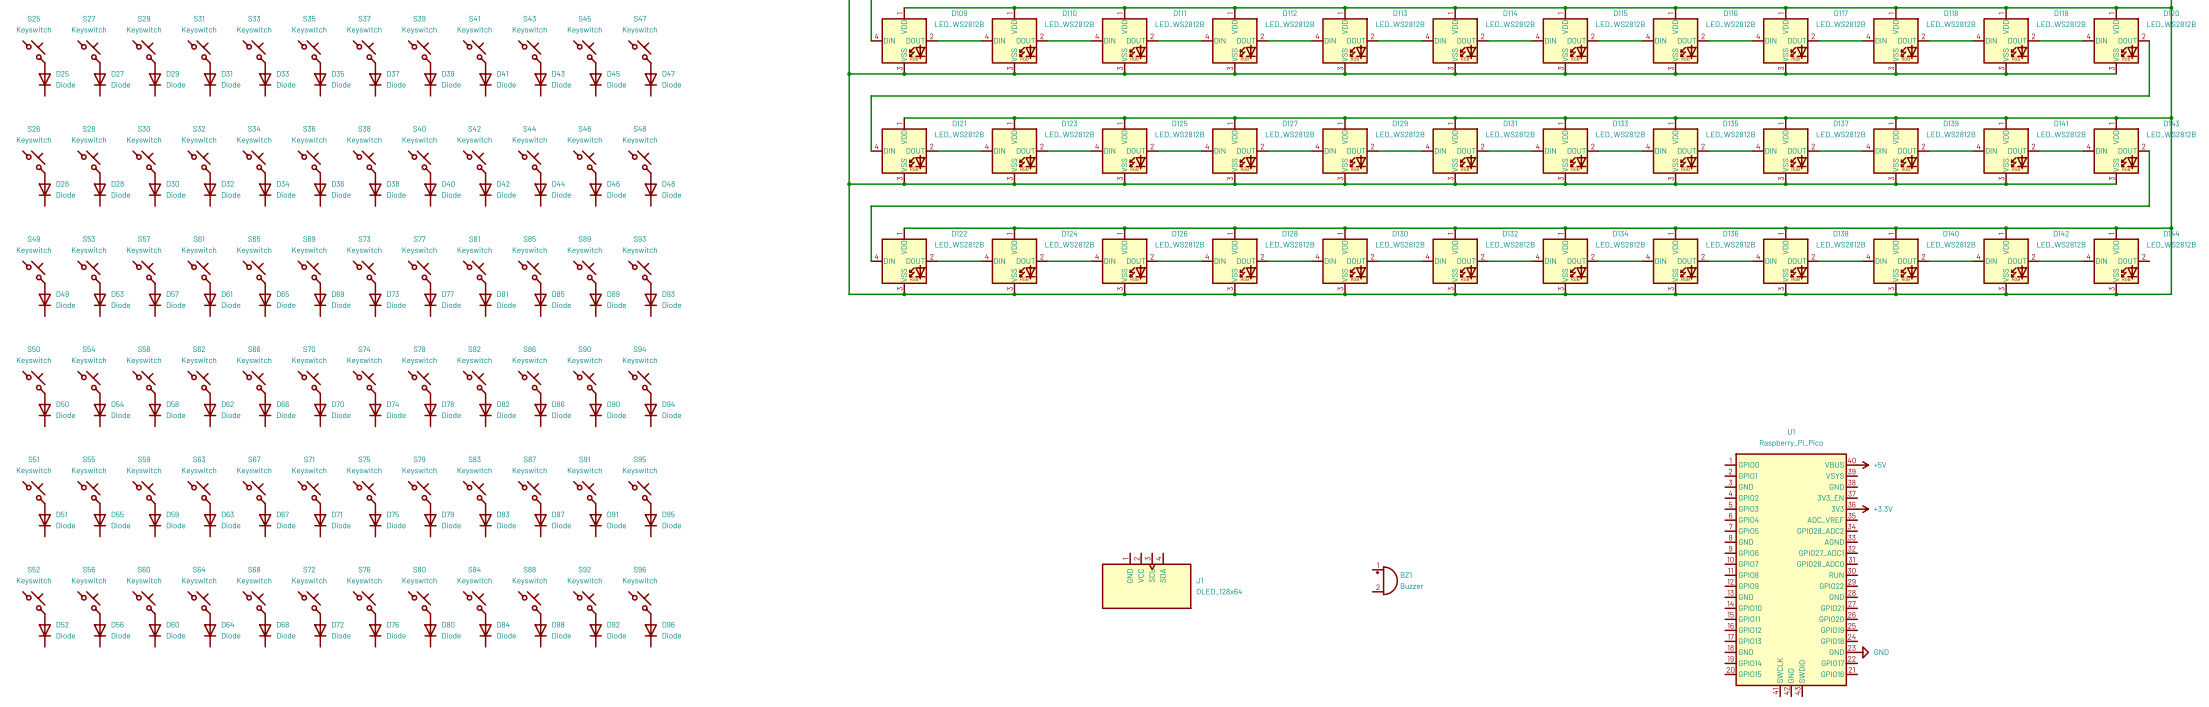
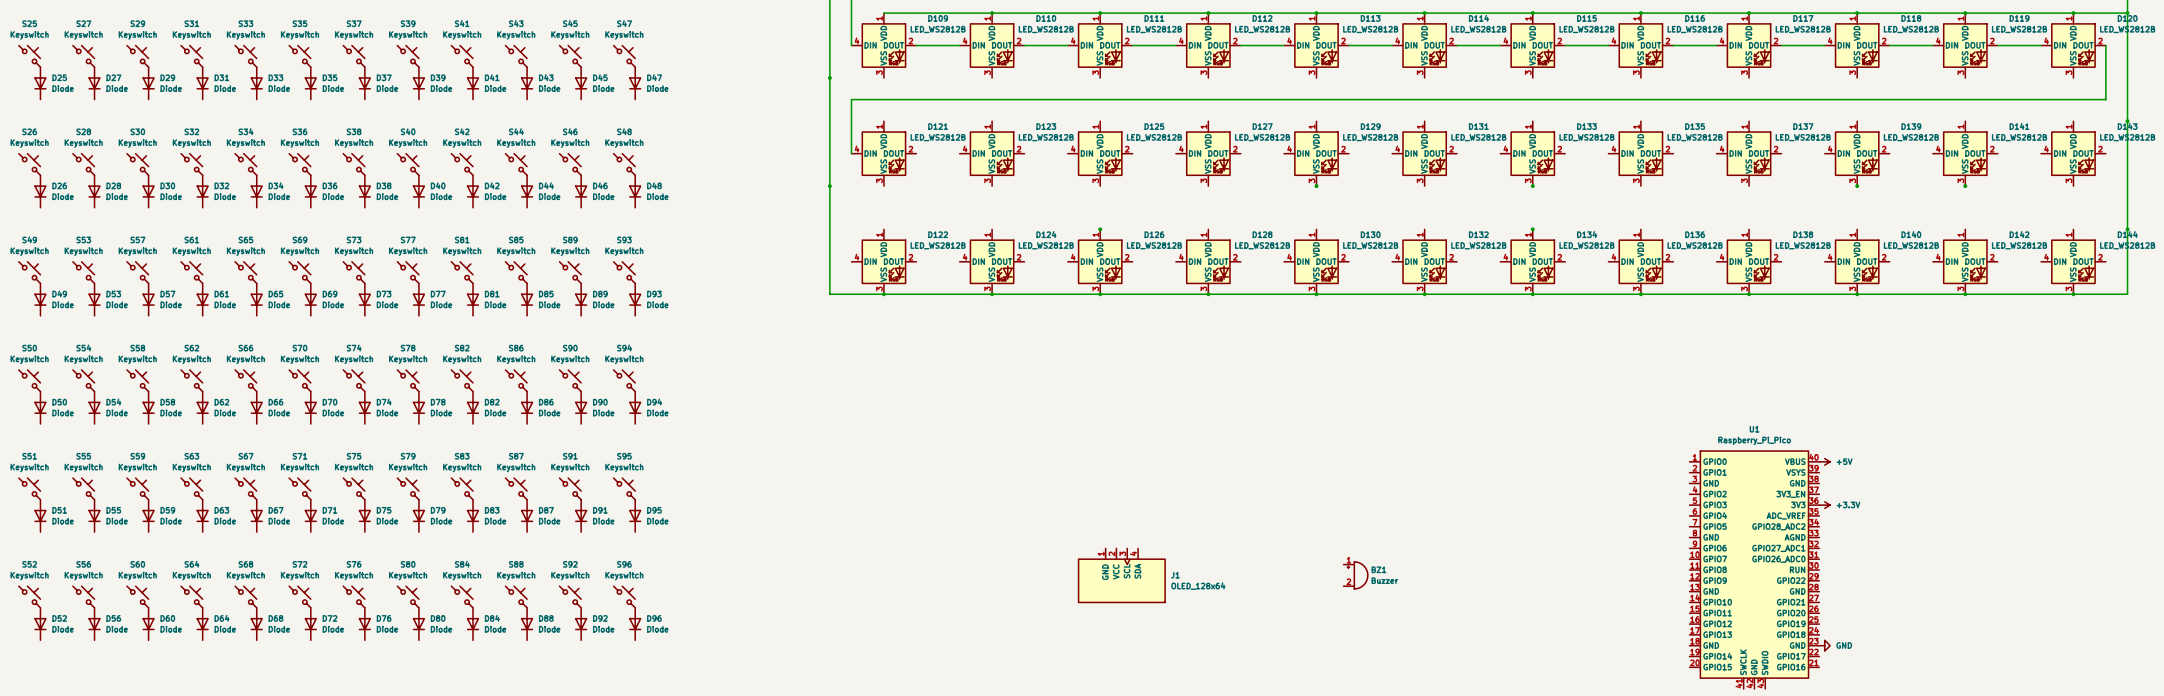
wire: (849, 73) (2116, 73) -> none
junction: (904, 73) -> none
junction: (1014, 73) -> none
junction: (1124, 73) -> none
junction: (1234, 73) -> none
junction: (1345, 73) -> none
junction: (1455, 73) -> none
junction: (1565, 73) -> none
junction: (1675, 73) -> none
junction: (1785, 73) -> none
junction: (1895, 73) -> none
junction: (2006, 73) -> none
wire: (904, 118) (2171, 118) -> none
junction: (1014, 118) -> none
junction: (1124, 118) -> none
junction: (1234, 118) -> none
junction: (1345, 118) -> none
junction: (1455, 118) -> none
junction: (1565, 118) -> none
junction: (1675, 118) -> none
junction: (1785, 118) -> none
junction: (1895, 118) -> none
junction: (2006, 118) -> none
junction: (2116, 118) -> none
wire: (937, 151) (981, 151) -> none
wire: (1047, 151) (1091, 151) -> none
wire: (1157, 151) (1201, 151) -> none
wire: (1267, 151) (1311, 151) -> none
wire: (1378, 151) (1422, 151) -> none
wire: (1488, 151) (1532, 151) -> none
wire: (1598, 151) (1642, 151) -> none
wire: (1708, 151) (1752, 151) -> none
wire: (1818, 151) (1862, 151) -> none
wire: (1928, 151) (1973, 151) -> none
wire: (2039, 151) (2083, 151) -> none
wire: (2149, 151) (2149, 206) (871, 206) (871, 261) -> none
wire: (849, 184) (2116, 184) -> none
junction: (904, 184) -> none
junction: (1014, 184) -> none
junction: (1124, 184) -> none
junction: (1234, 184) -> none
junction: (1455, 184) -> none
junction: (1675, 184) -> none
junction: (1785, 184) -> none
wire: (904, 228) (2171, 228) -> none
junction: (1014, 228) -> none
junction: (1234, 228) -> none
junction: (1345, 228) -> none
junction: (1455, 228) -> none
junction: (1675, 228) -> none
junction: (1785, 228) -> none
junction: (1895, 228) -> none
junction: (2006, 228) -> none
junction: (2116, 228) -> none
wire: (937, 261) (981, 261) -> none
wire: (1047, 261) (1091, 261) -> none
wire: (1157, 261) (1201, 261) -> none
wire: (1267, 261) (1311, 261) -> none
wire: (1378, 261) (1422, 261) -> none
wire: (1488, 261) (1532, 261) -> none
wire: (1598, 261) (1642, 261) -> none
wire: (1708, 261) (1752, 261) -> none
wire: (1818, 261) (1862, 261) -> none
wire: (1928, 261) (1973, 261) -> none
wire: (2039, 261) (2083, 261) -> none

